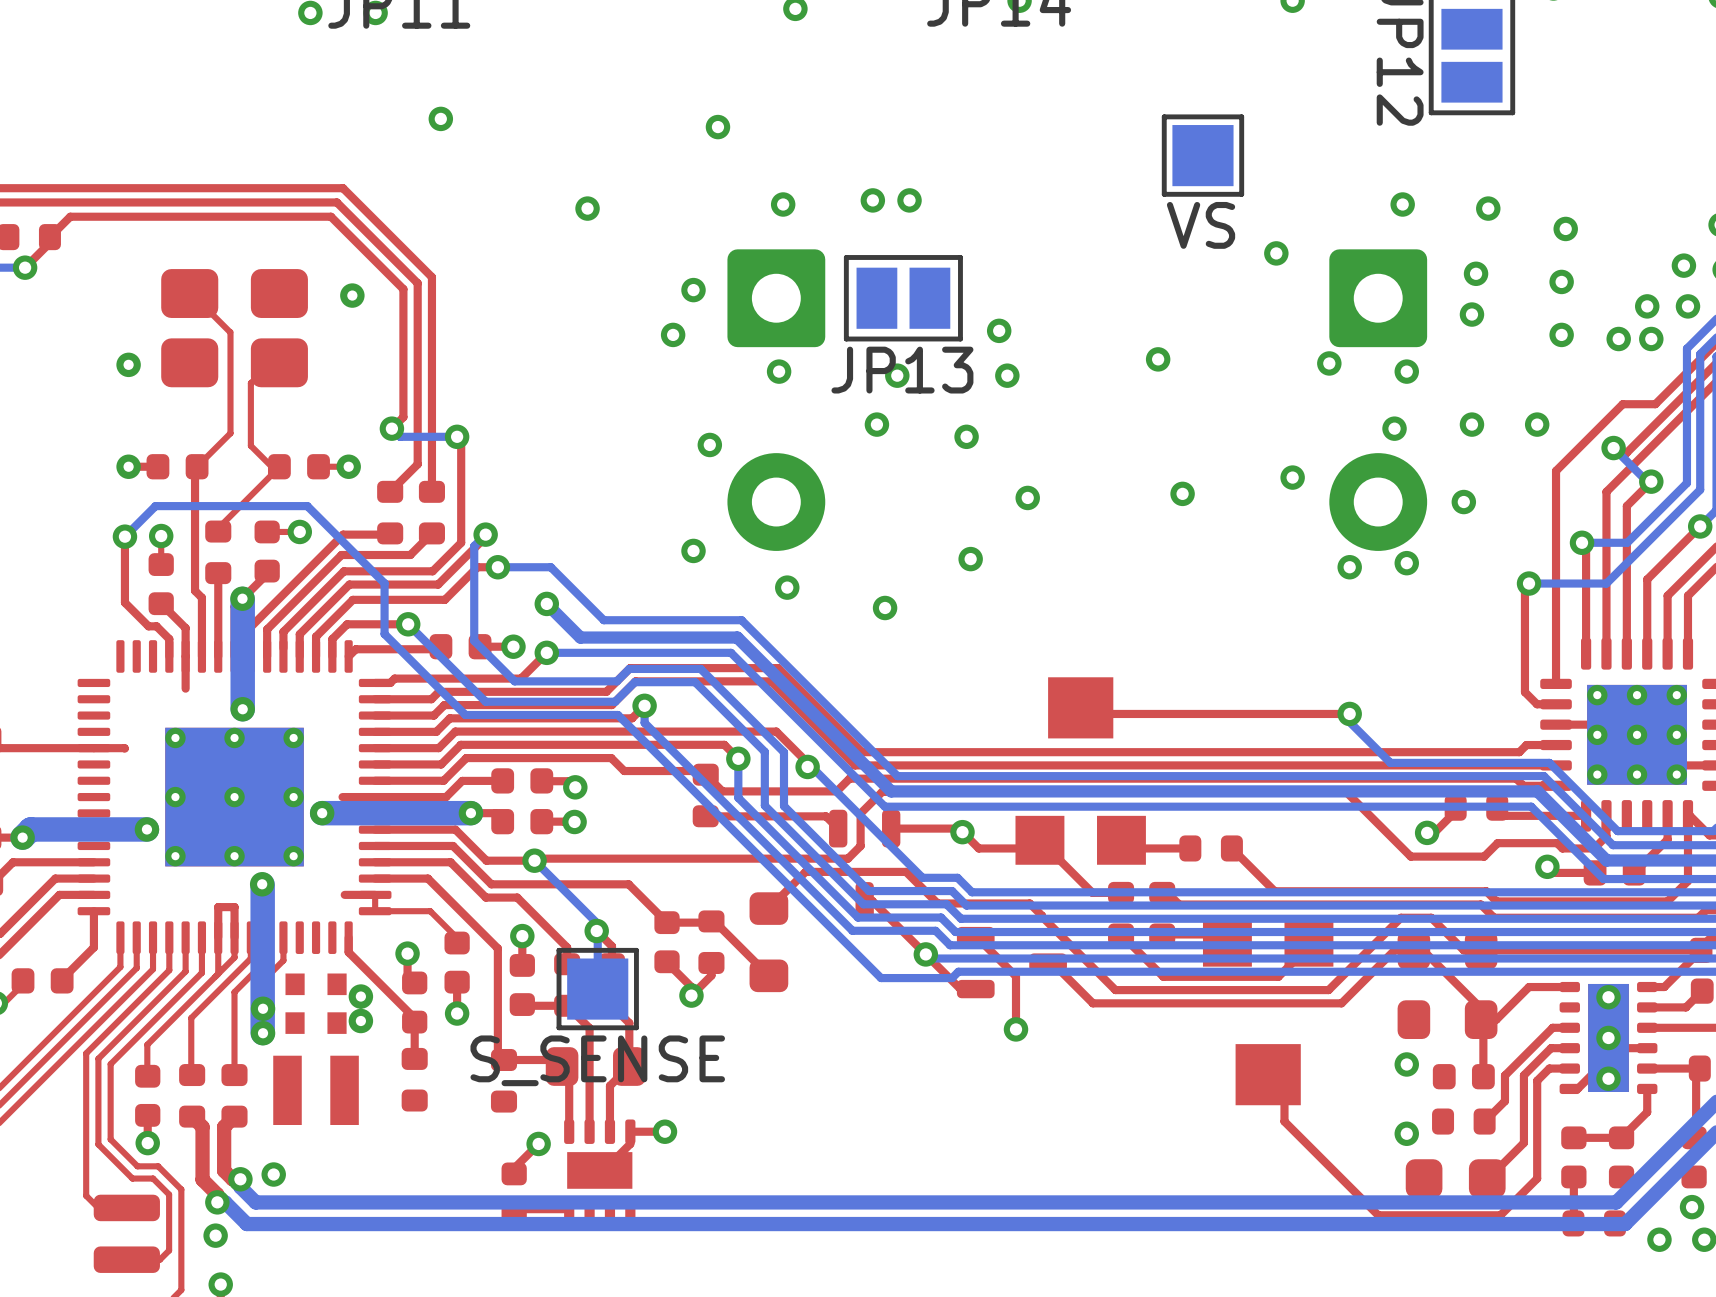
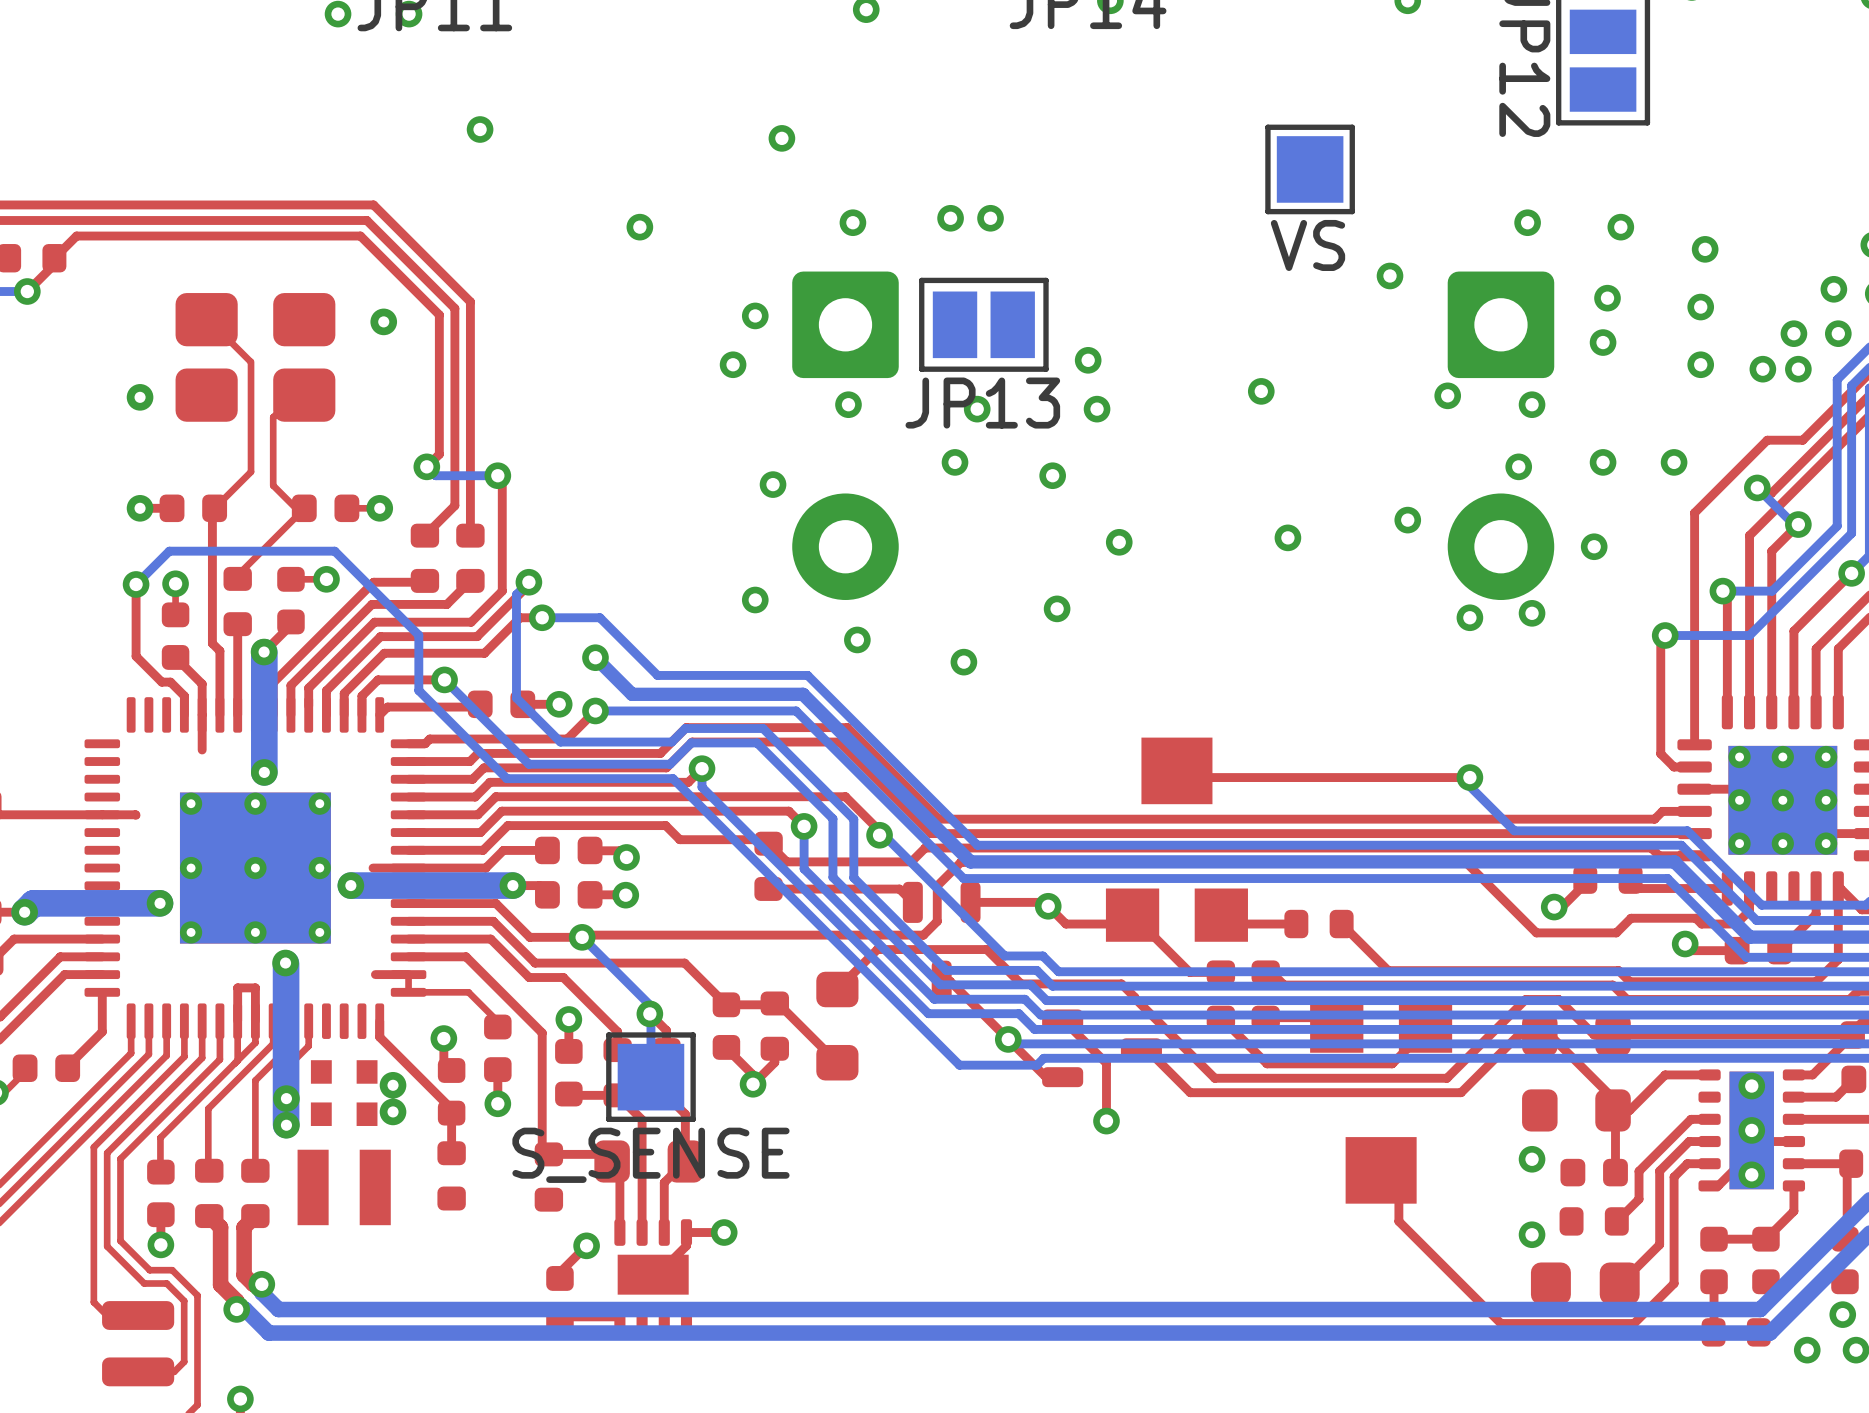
via: (273, 1174) -> none
via: (215, 1235) -> none

